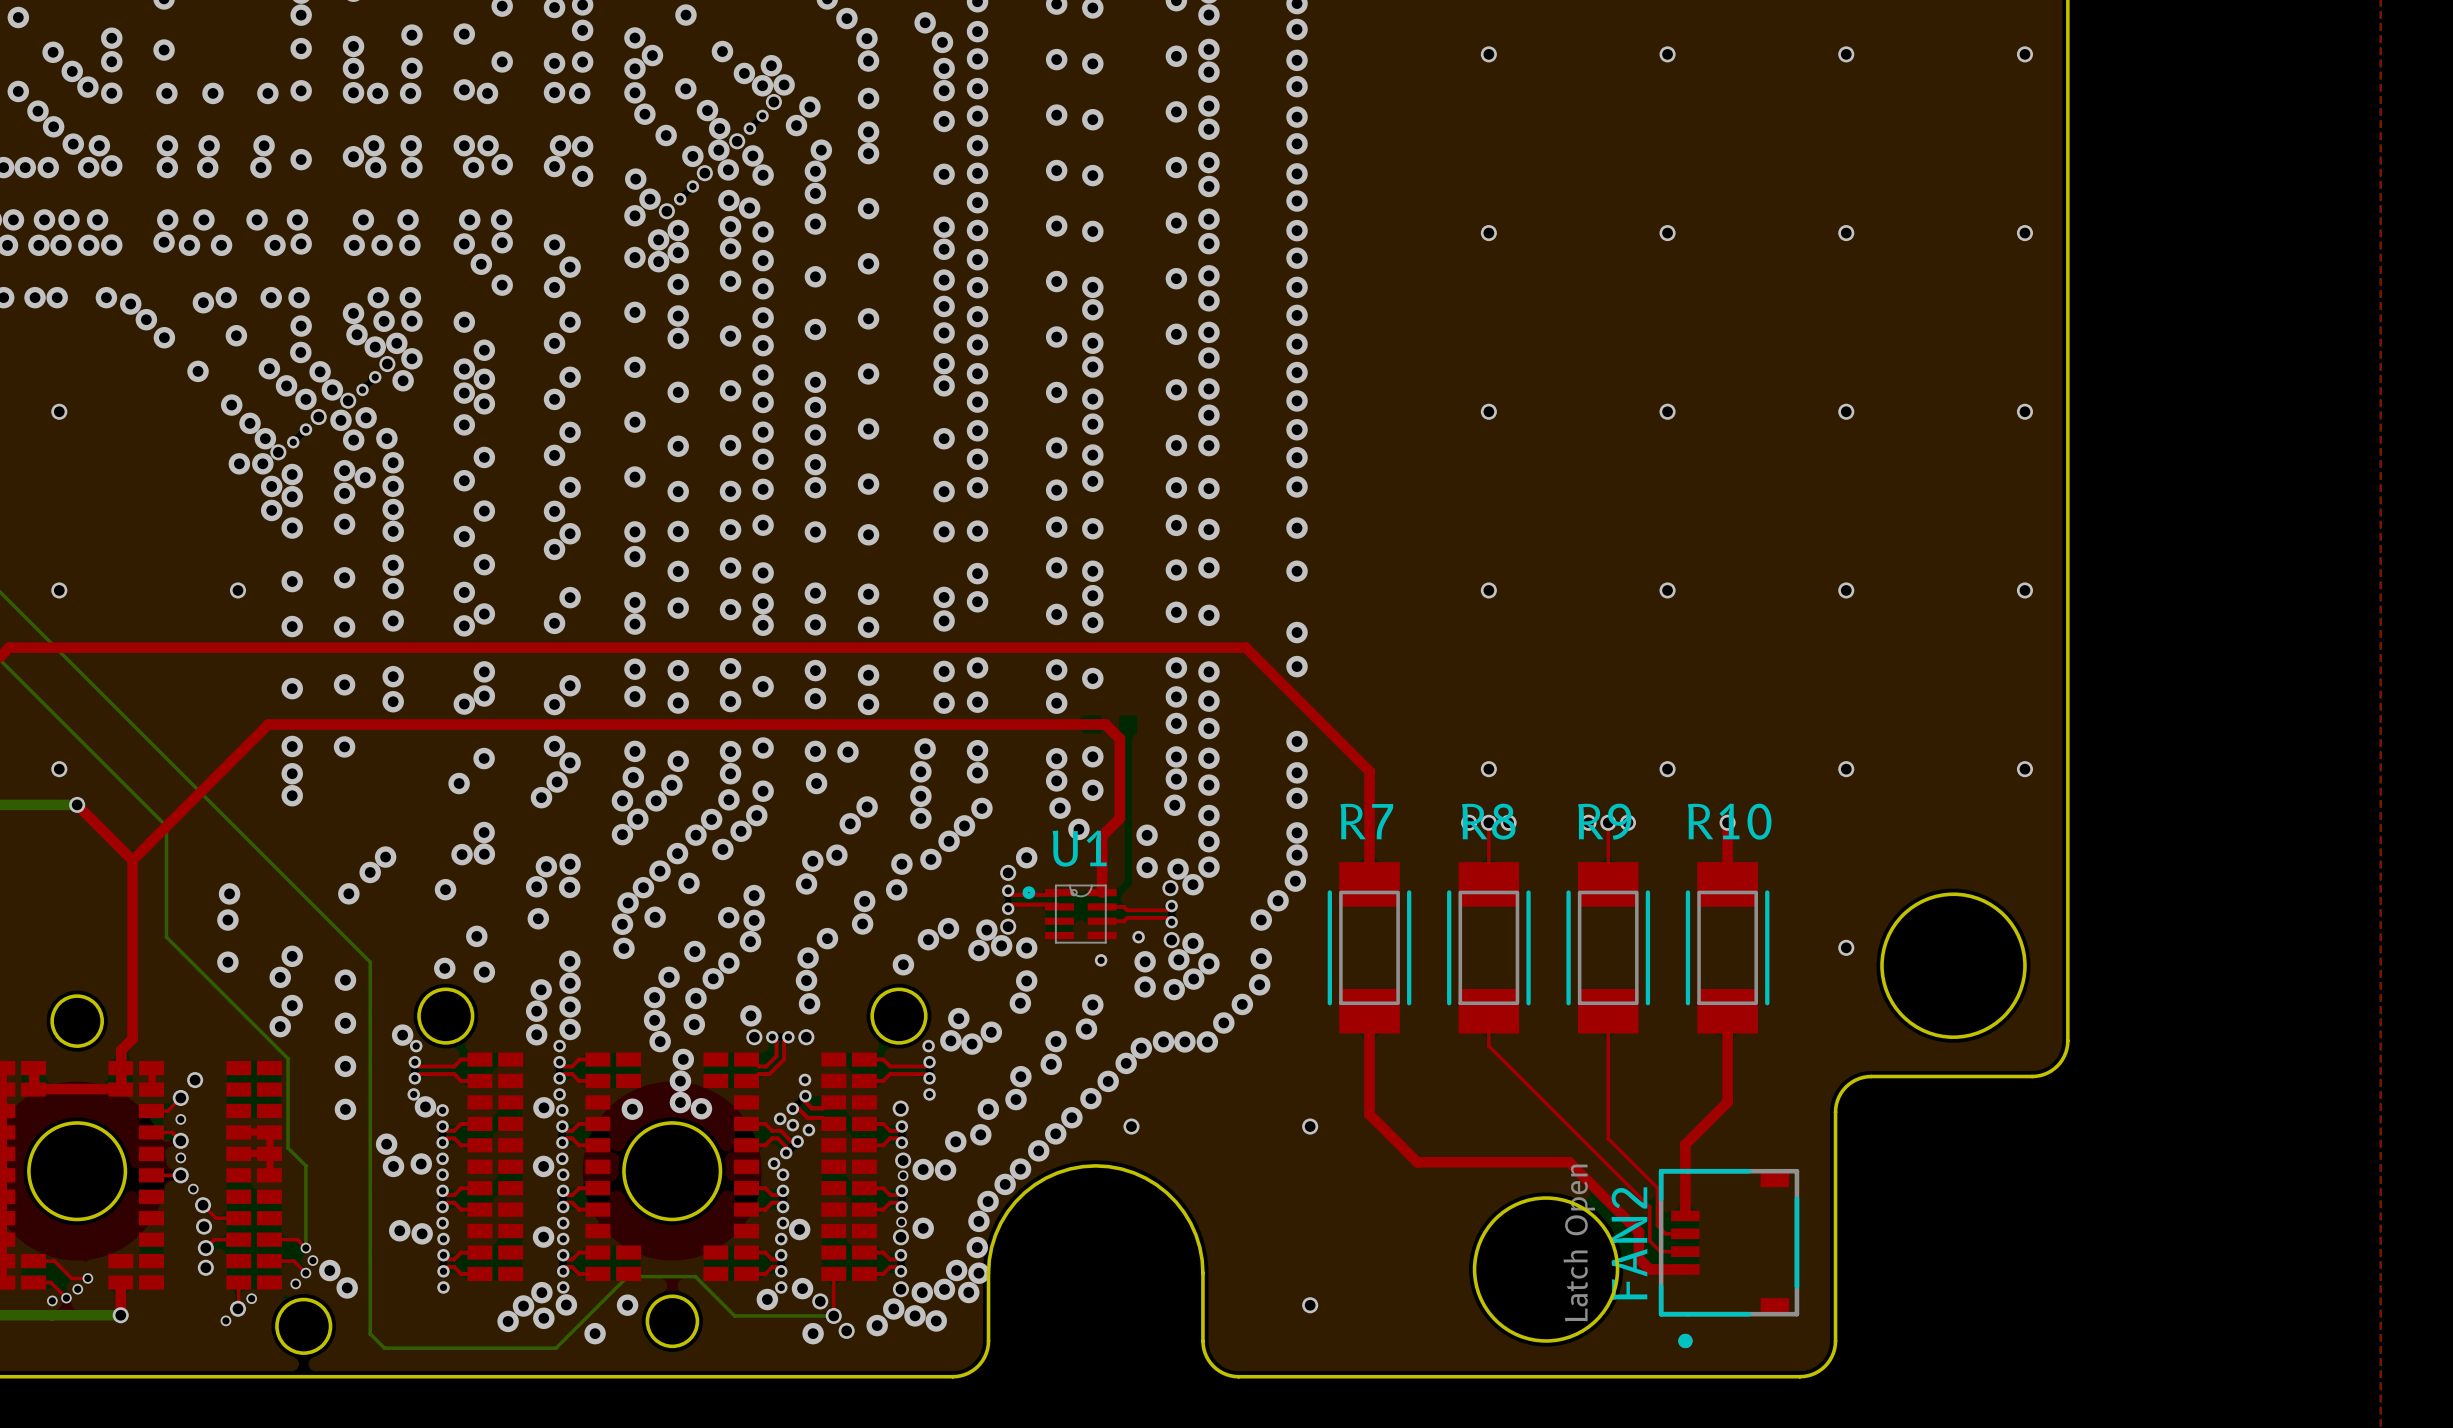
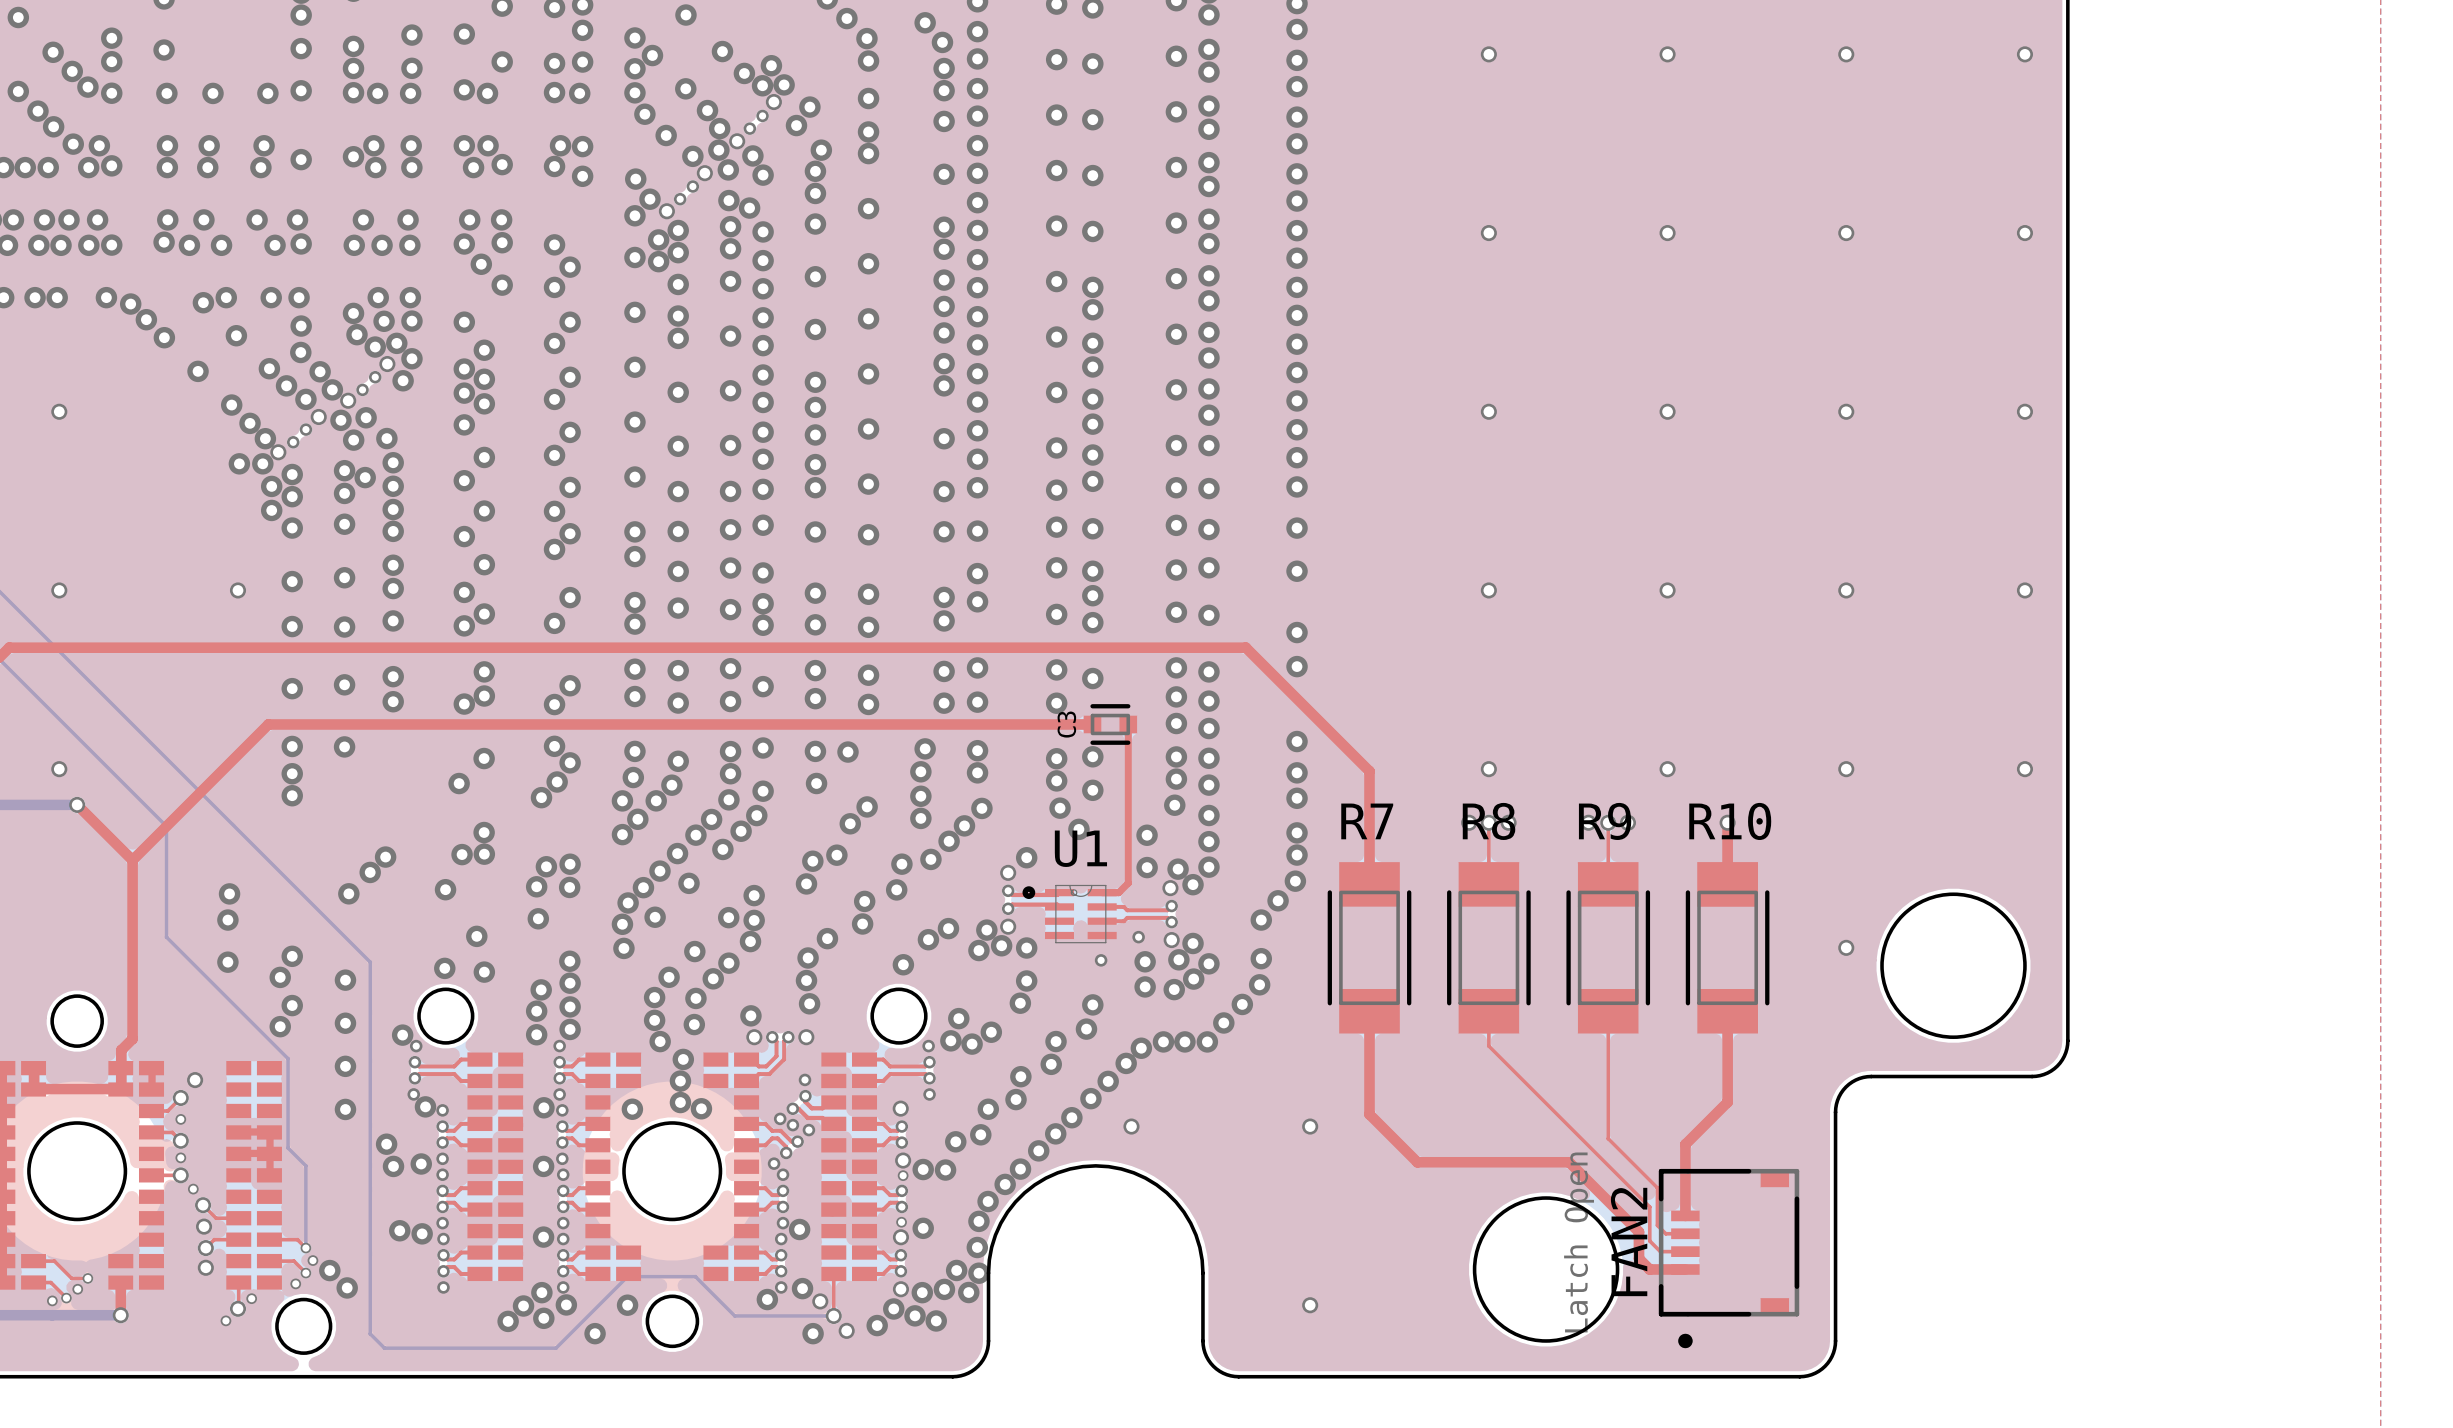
top track: (1092, 724) (1105, 724) (1119, 738) (1119, 818) (1102, 835) (1102, 892) -> (1128, 724) (1128, 883) (1118, 892) (1102, 892)
C3: none -> (1110, 724)

